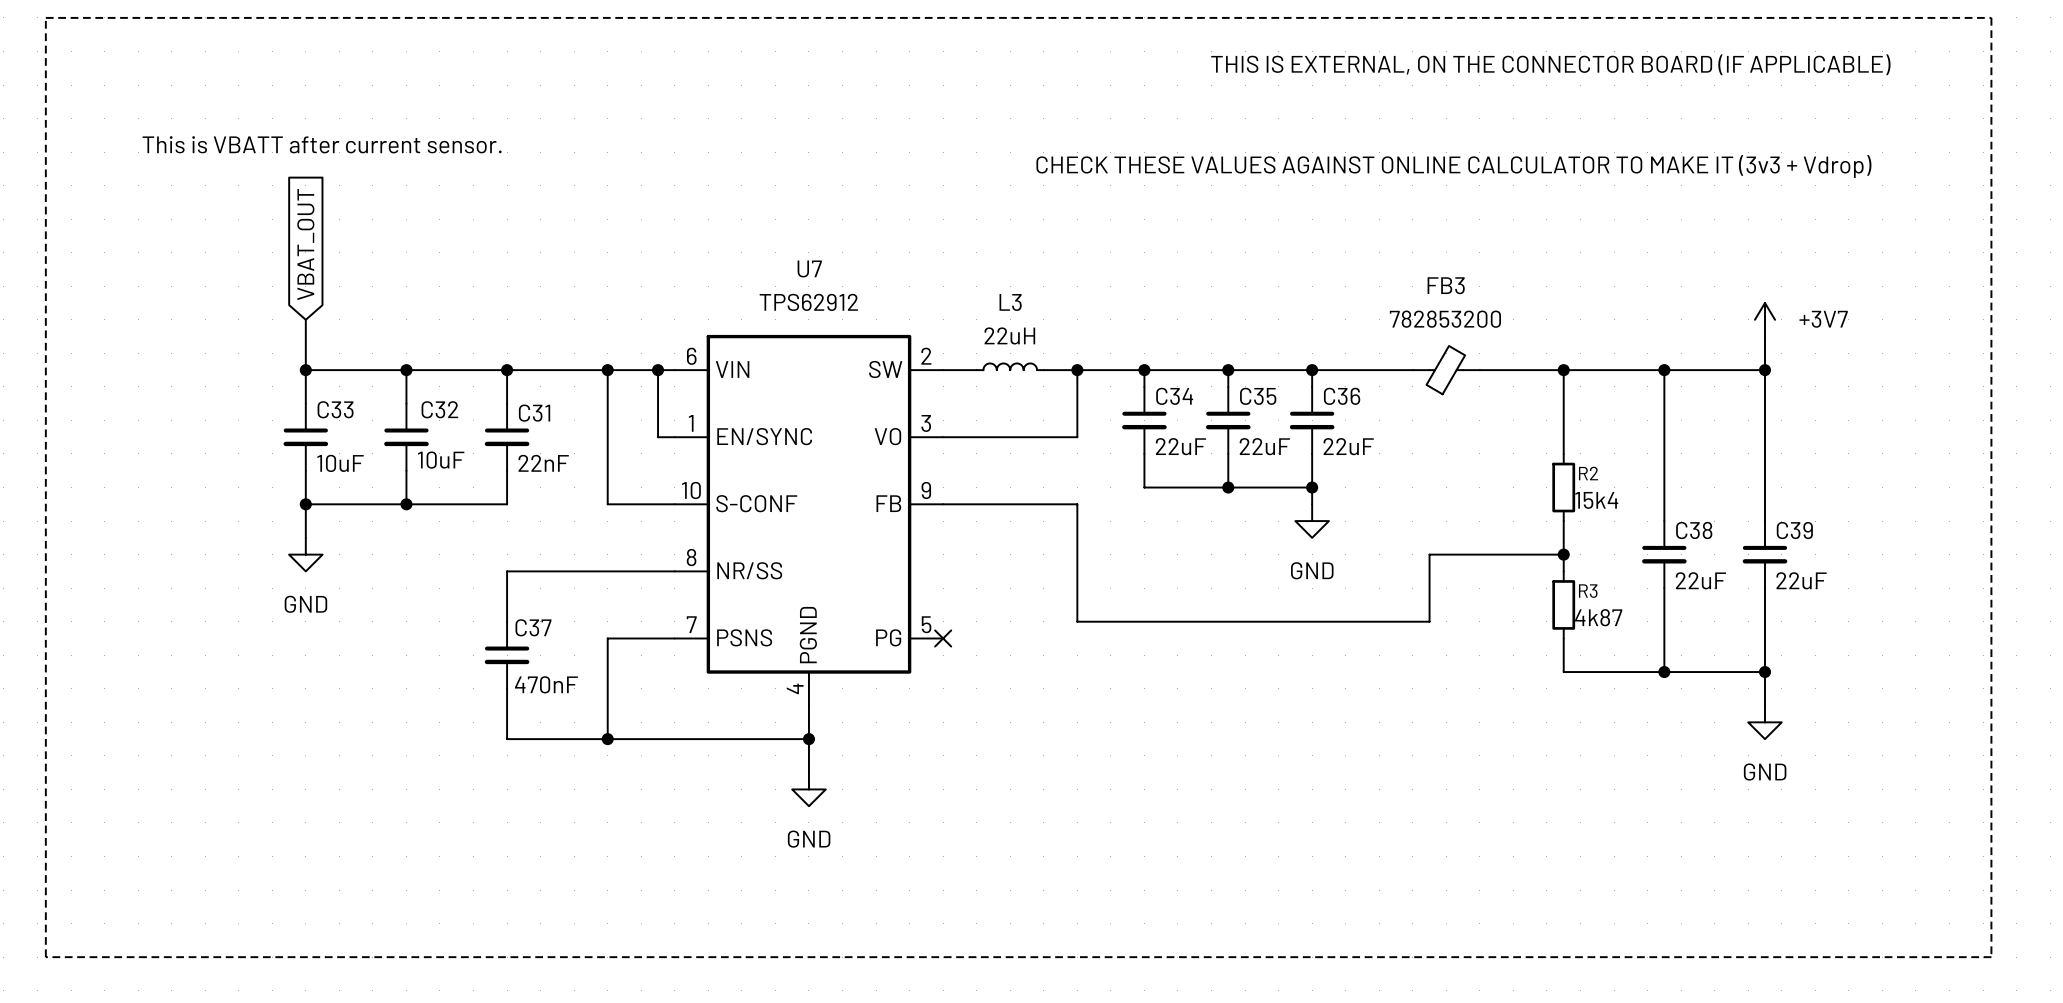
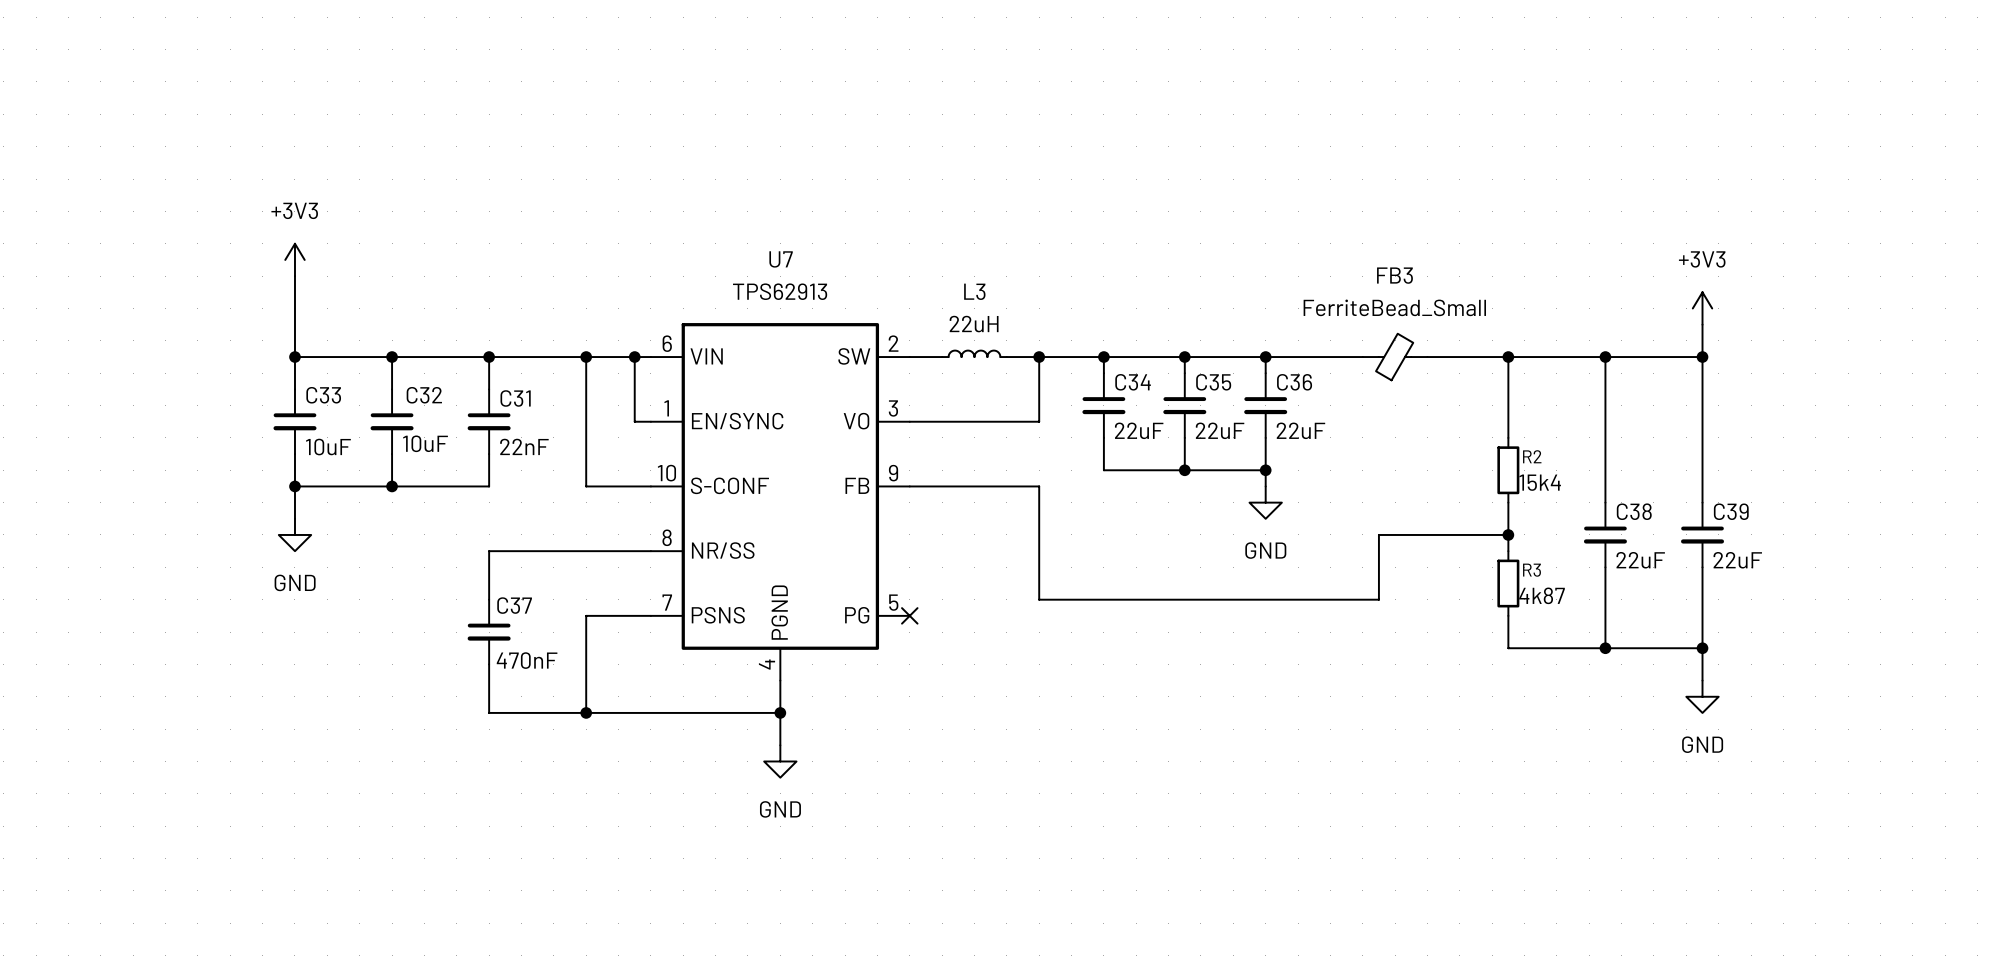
line: (45, 17) (1991, 17) (1991, 957) (45, 957) (45, 17) -> none
text: THIS IS EXTERNAL, ON THE CONNECTOR BOARD (IF APPLICABLE) (1550, 64) -> none
text: This is VBATT after current sensor. (322, 144) -> none
text: CHECK THESE VALUES AGAINST ONLINE CALCULATOR TO MAKE IT (3v3 + Vdrop) (1453, 166) -> none
global label: VBAT_OUT (305, 244) -> none
power symbol: none -> +3V3 (294, 259)
wire: none -> (294, 276) (294, 308)
U7 value: TPS62912 (808, 302) -> TPS62913 (780, 291)
FB3 value: 782853200 (1445, 319) -> FerriteBead_Small (1394, 307)
power symbol: +3V7 (1765, 319) -> +3V3 (1702, 308)

